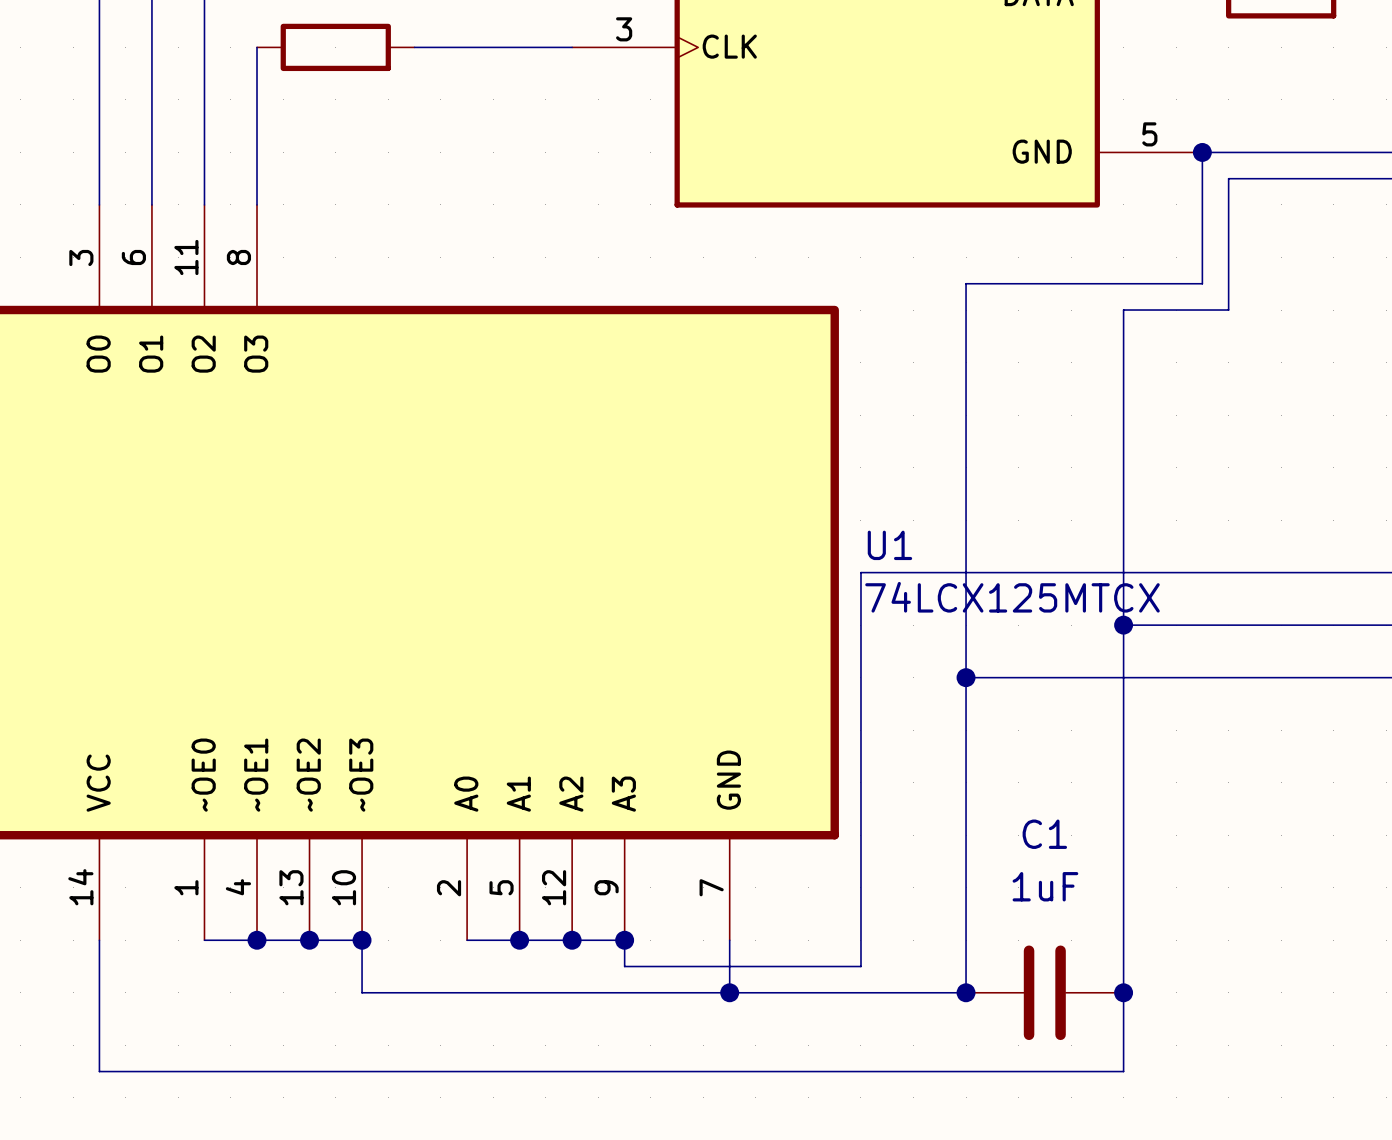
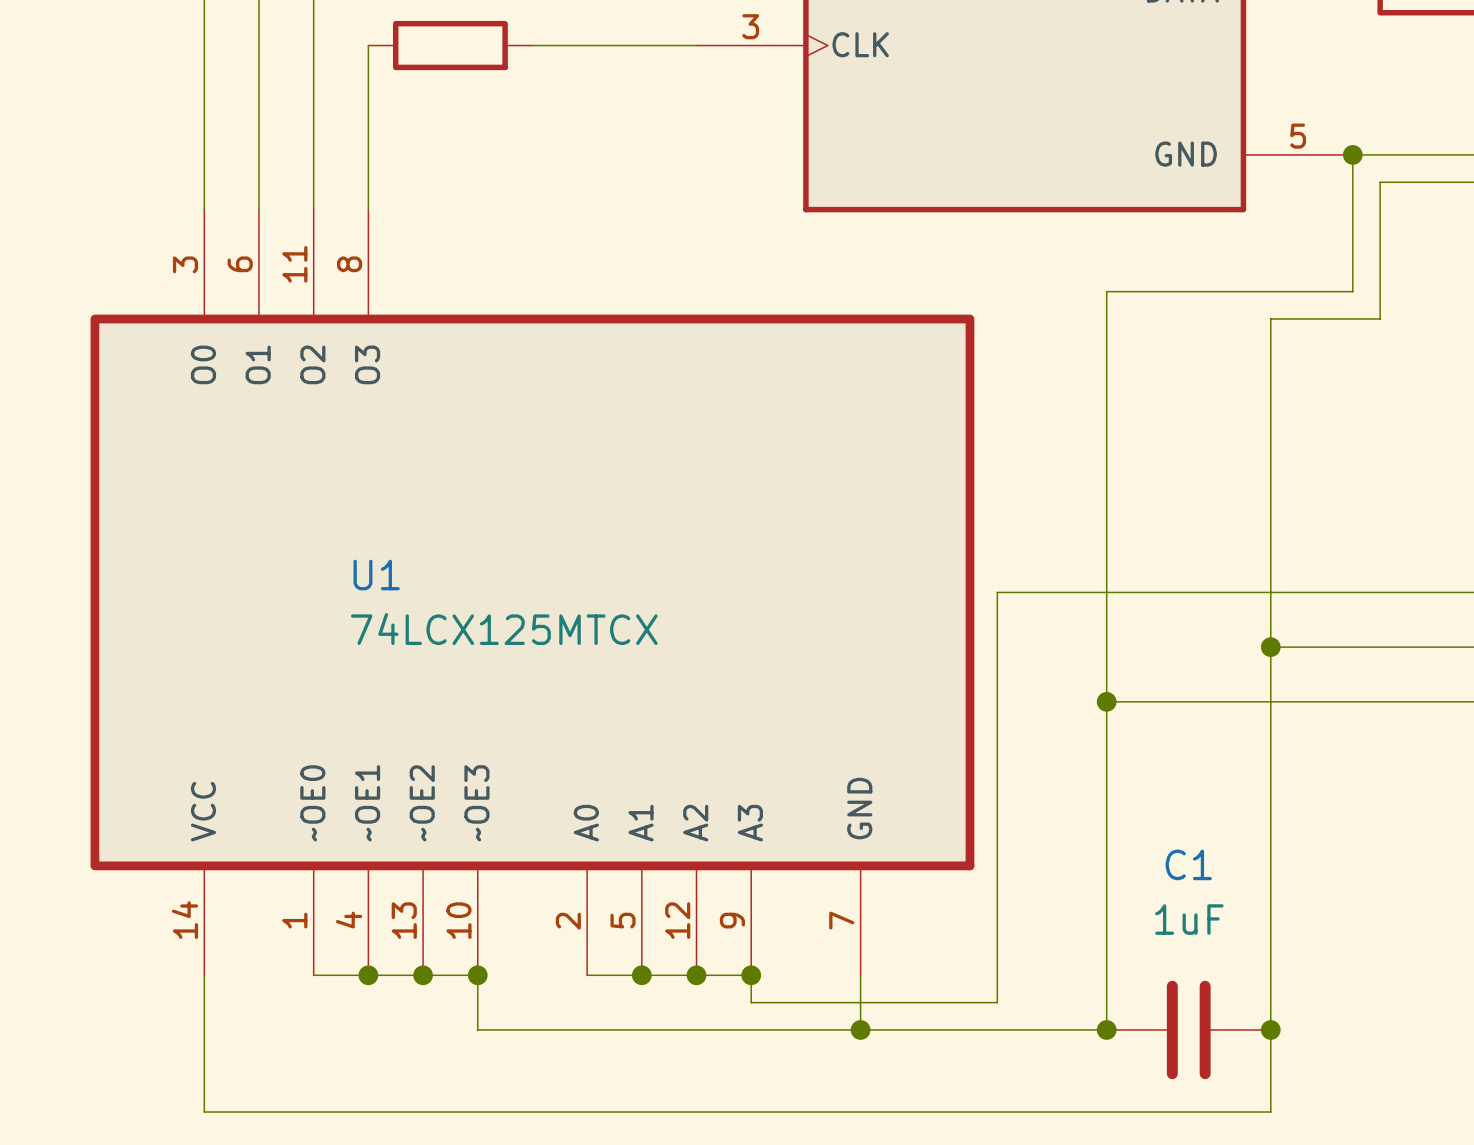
U1 name position: U1 (889, 545) -> U1 (376, 575)
U1 value position: 74LCX125MTCX (1012, 597) -> 74LCX125MTCX (504, 629)

